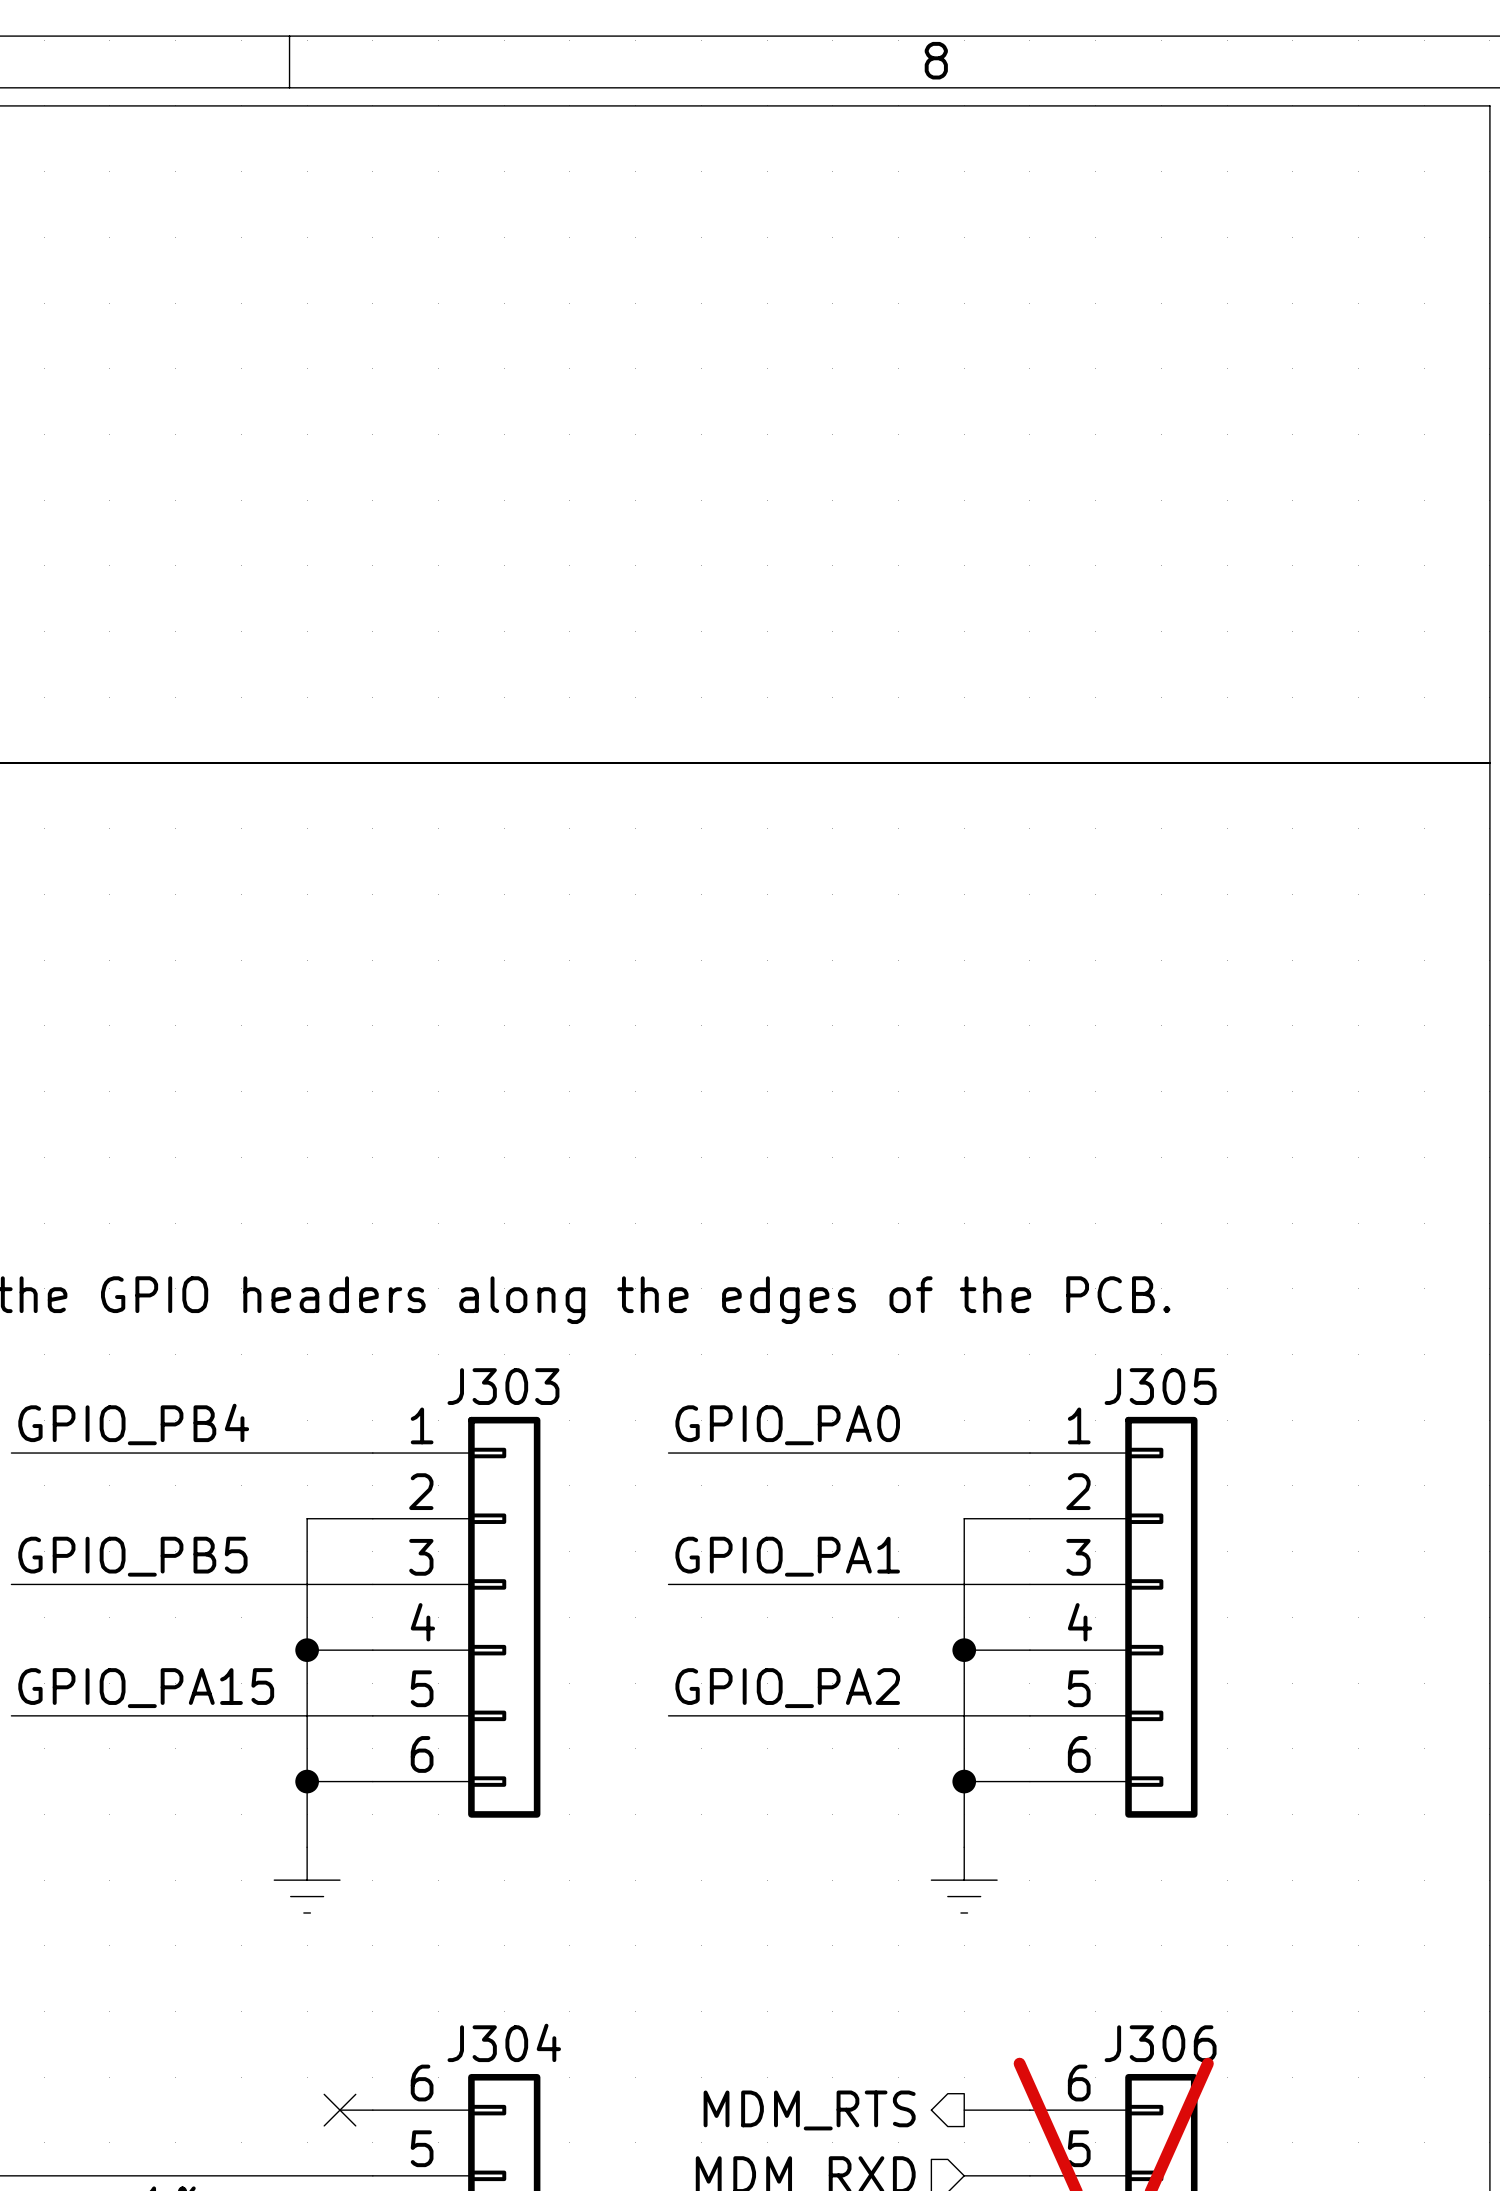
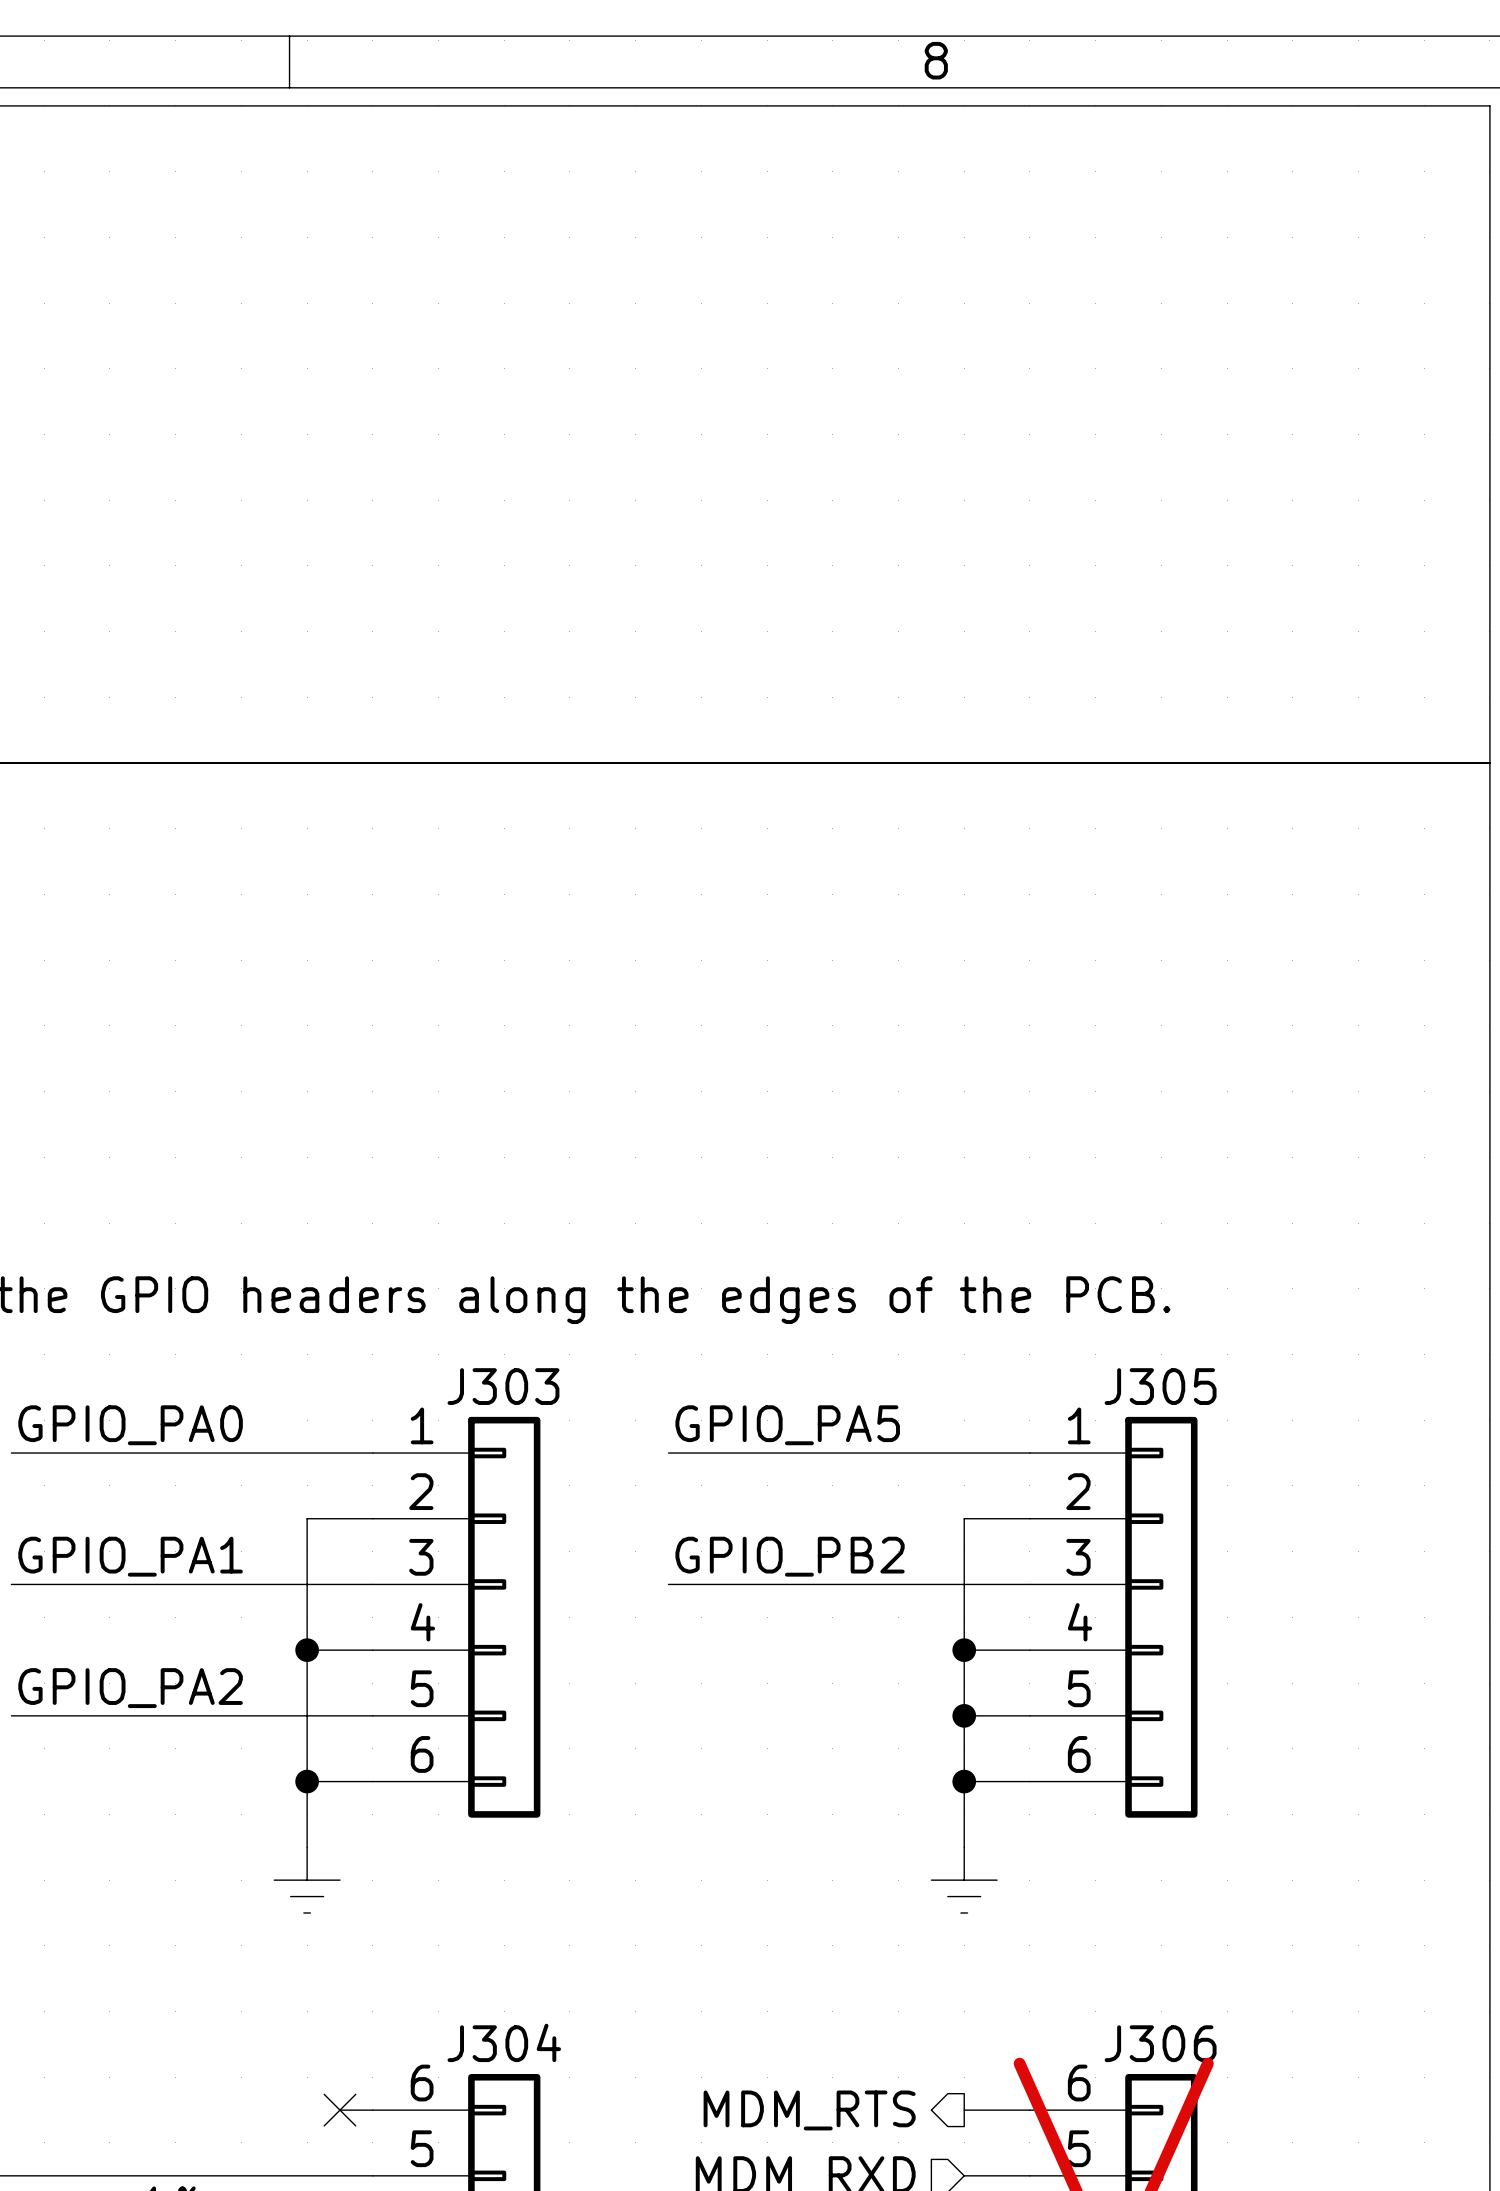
label: GPIO_PB4 (133, 1424) -> GPIO_PA0 (130, 1425)
label: GPIO_PA0 (787, 1425) -> GPIO_PA5 (787, 1425)
label: GPIO_PB5 (132, 1556) -> GPIO_PA1 (130, 1556)
label: GPIO_PA1 (787, 1556) -> GPIO_PB2 (790, 1556)
label: GPIO_PA15 (146, 1688) -> GPIO_PA2 (130, 1688)
label: GPIO_PA2 (787, 1688) -> none
wire: (668, 1715) (964, 1715) -> none
junction: none -> (964, 1715)

